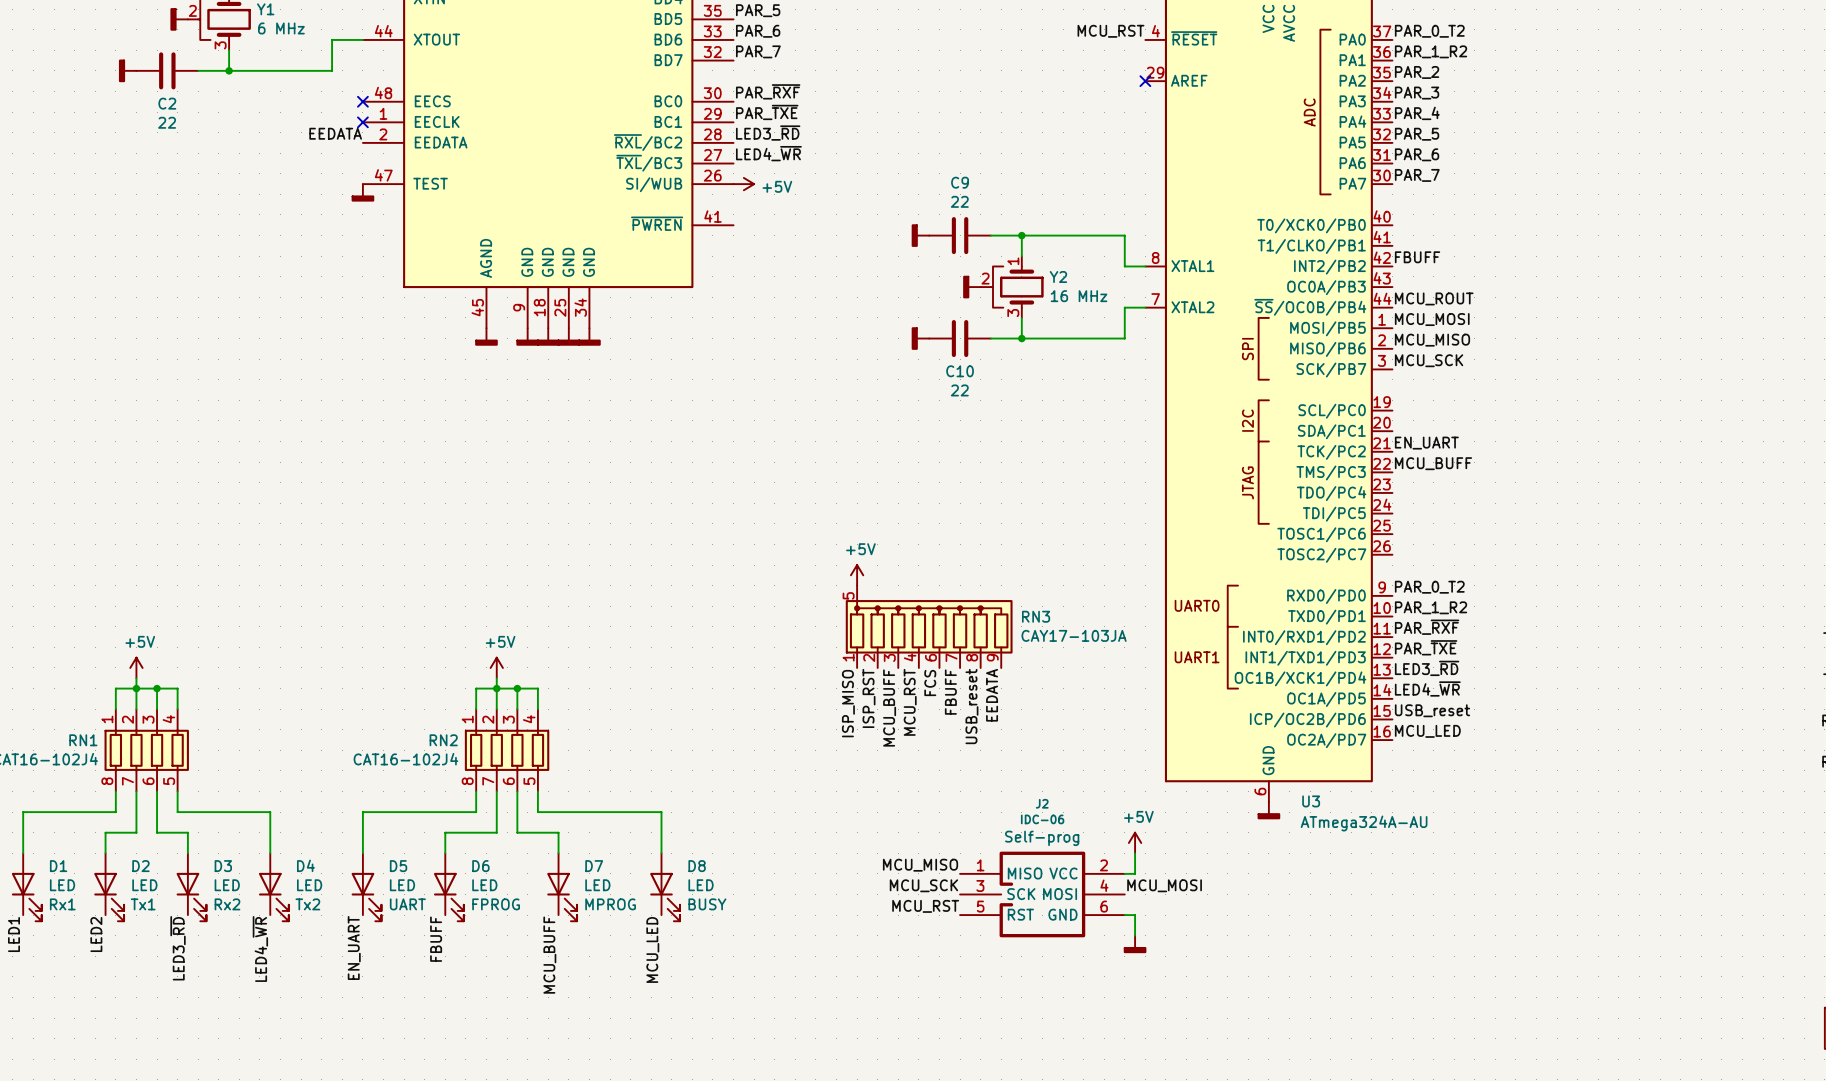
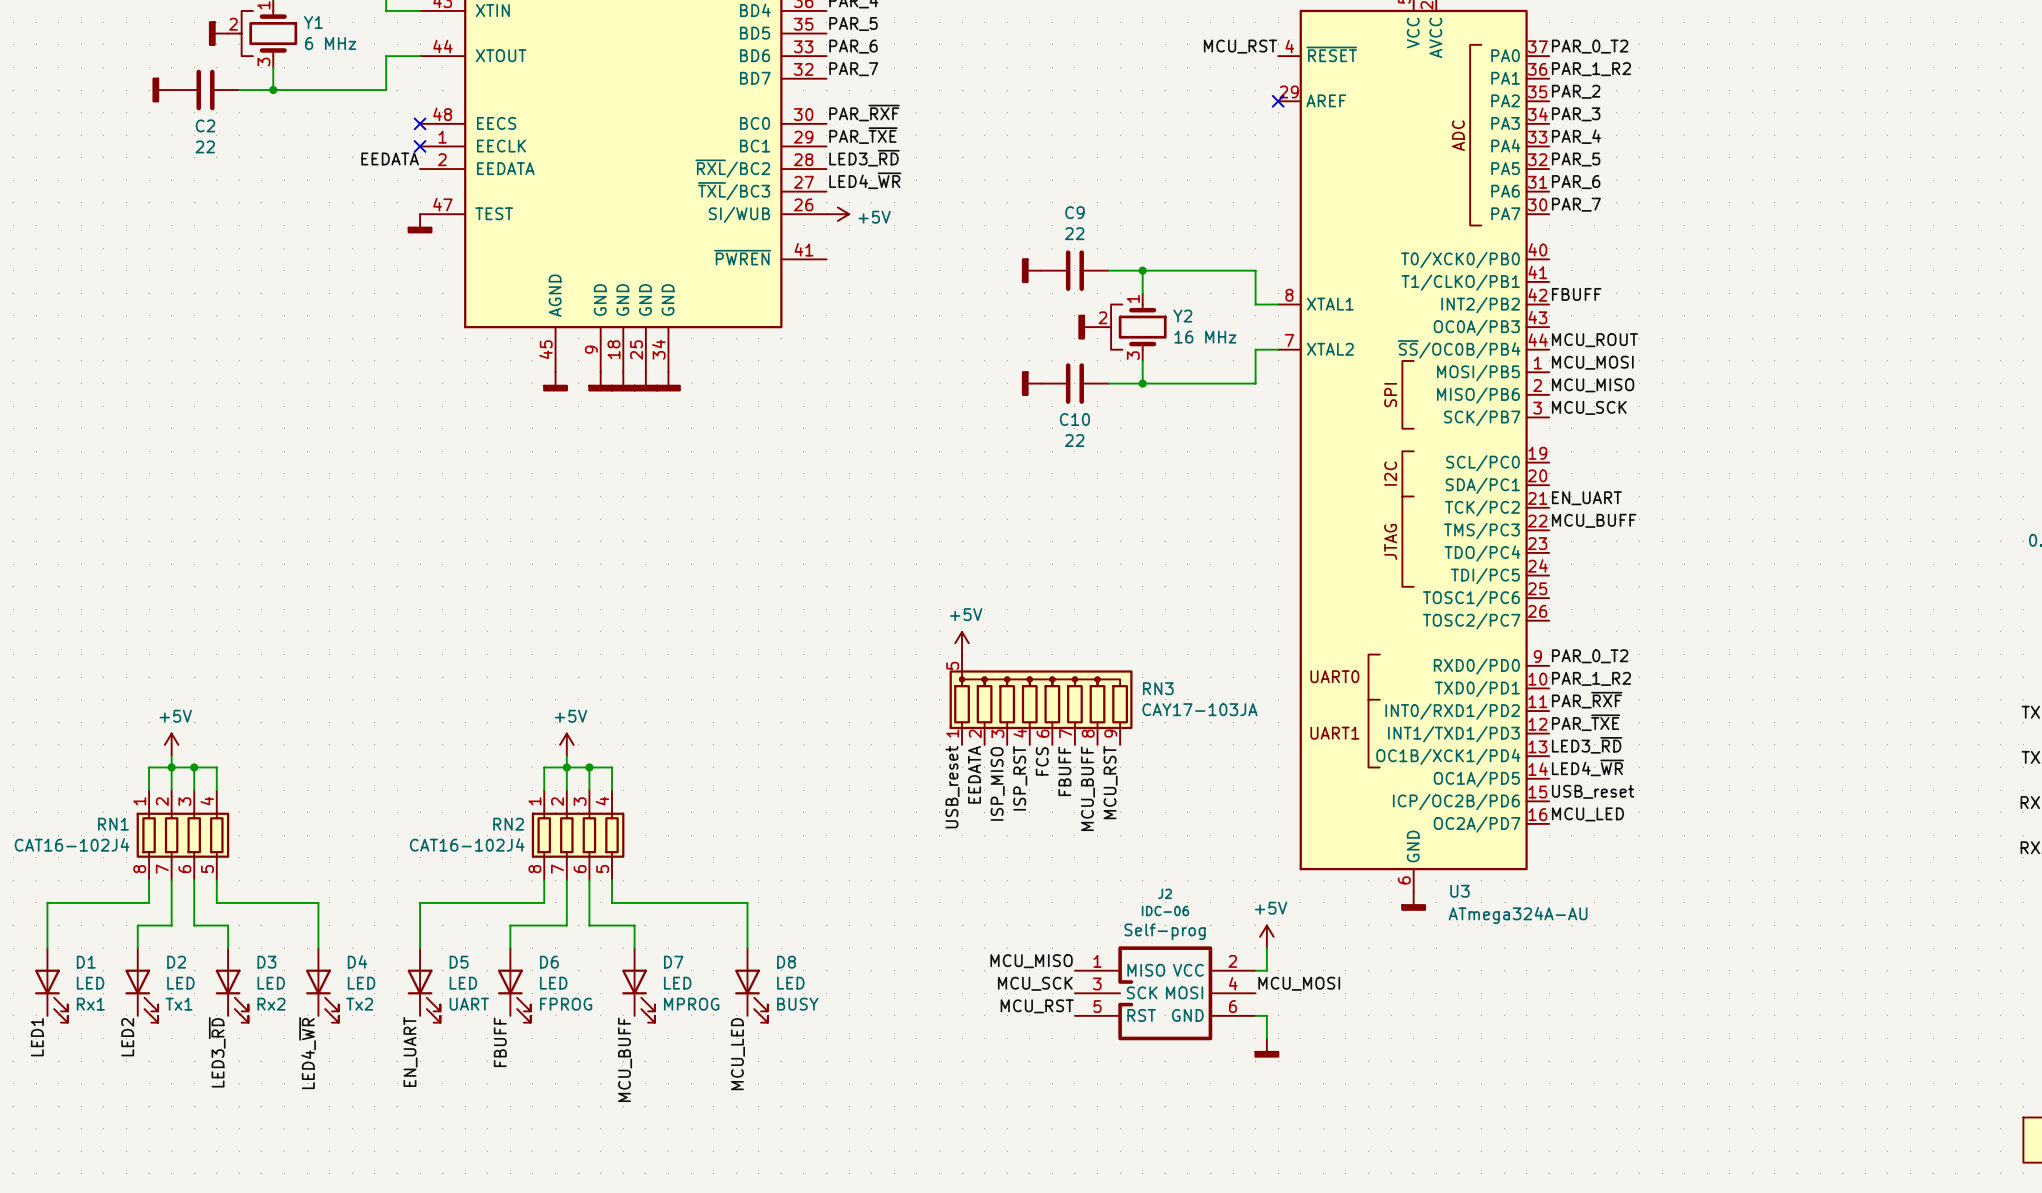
label: EEDATA (992, 695) -> MCU_RST (1110, 782)
label: ISP_RST (868, 698) -> EEDATA (974, 774)
label: MCU_RST (910, 702) -> ISP_RST (1020, 778)
label: ISP_MISO (848, 703) -> USB_reset (952, 787)
label: USB_reset (971, 706) -> MCU_BUFF (1087, 788)
label: MCU_BUFF (889, 708) -> ISP_MISO (997, 783)

